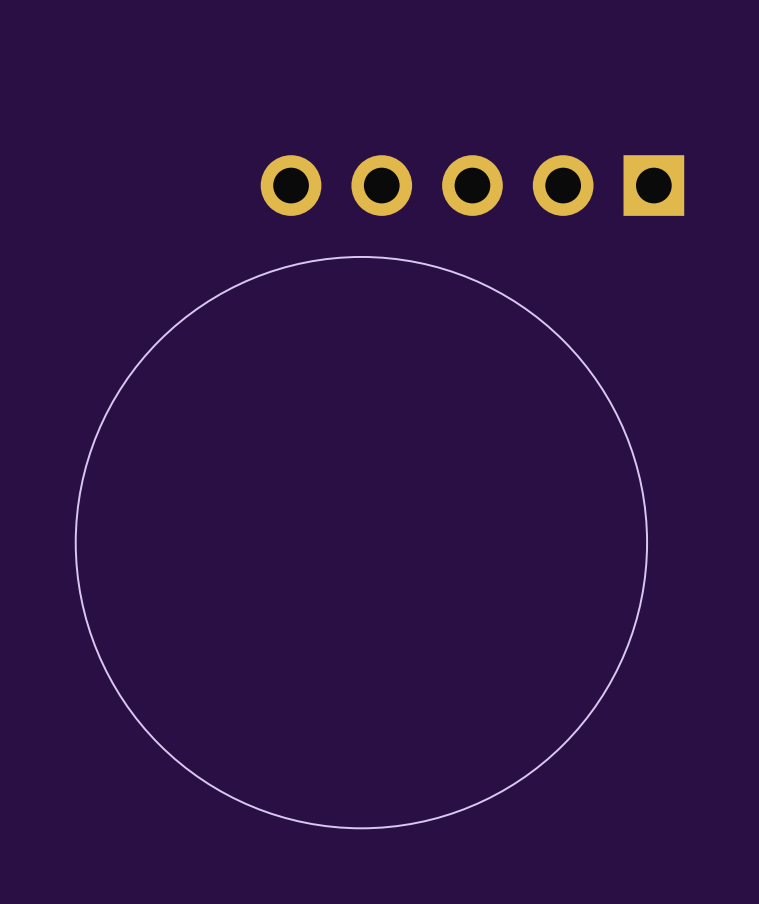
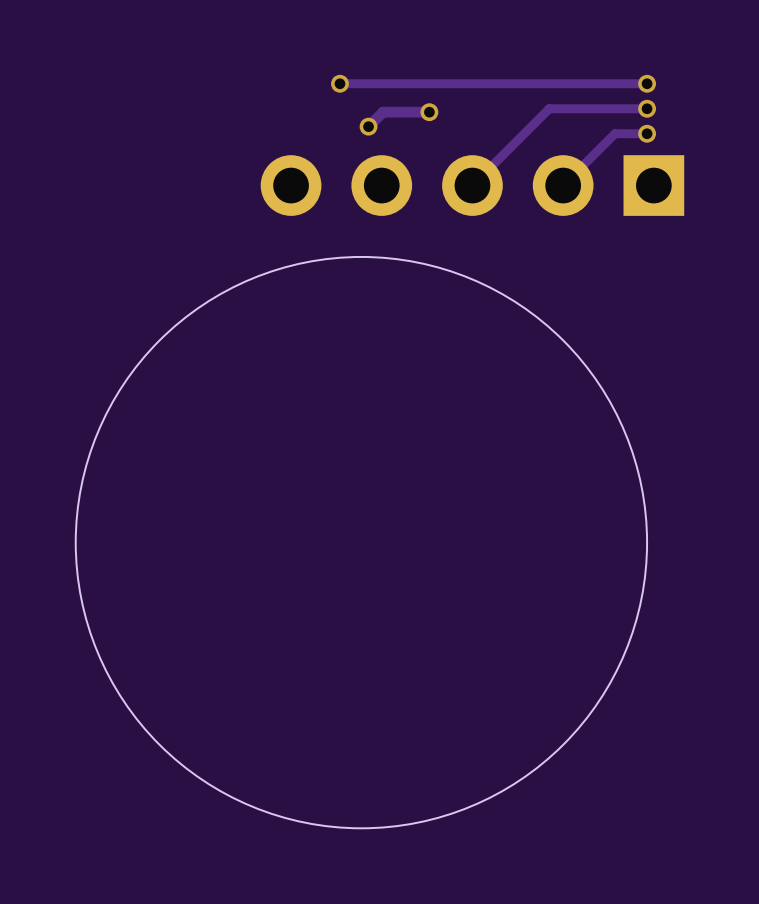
via: none -> (339, 83)
track: none -> (647, 83) (339, 83)
via: none -> (647, 83)
track: none -> (647, 108) (549, 108) (472, 185)
via: none -> (647, 108)
track: none -> (429, 112) (383, 112) (368, 126)
via: none -> (429, 112)
via: none -> (368, 126)
track: none -> (647, 133) (614, 133) (563, 185)
via: none -> (647, 133)

